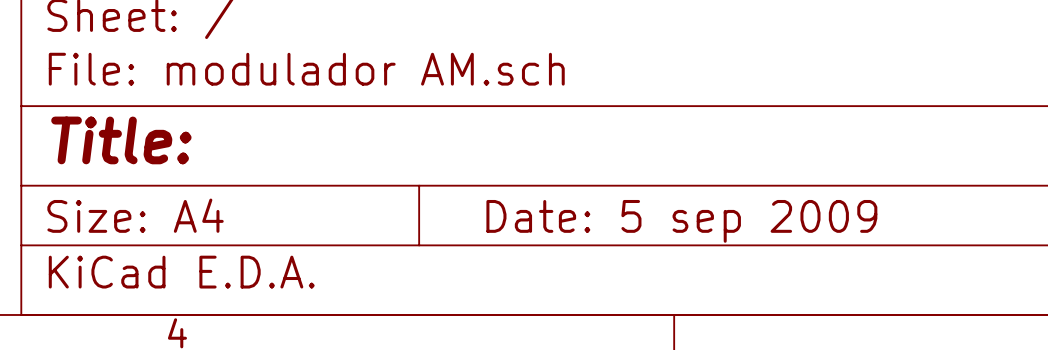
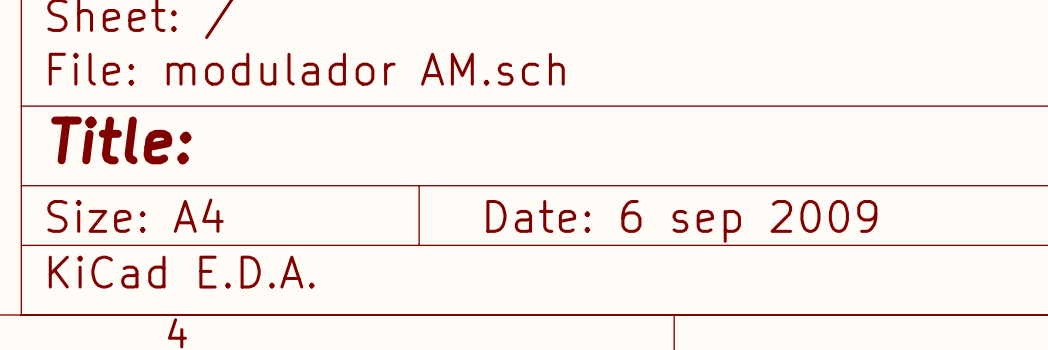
title block: Date: 5 sep 2009 (681, 221) -> Date: 6 sep 2009 (681, 221)

